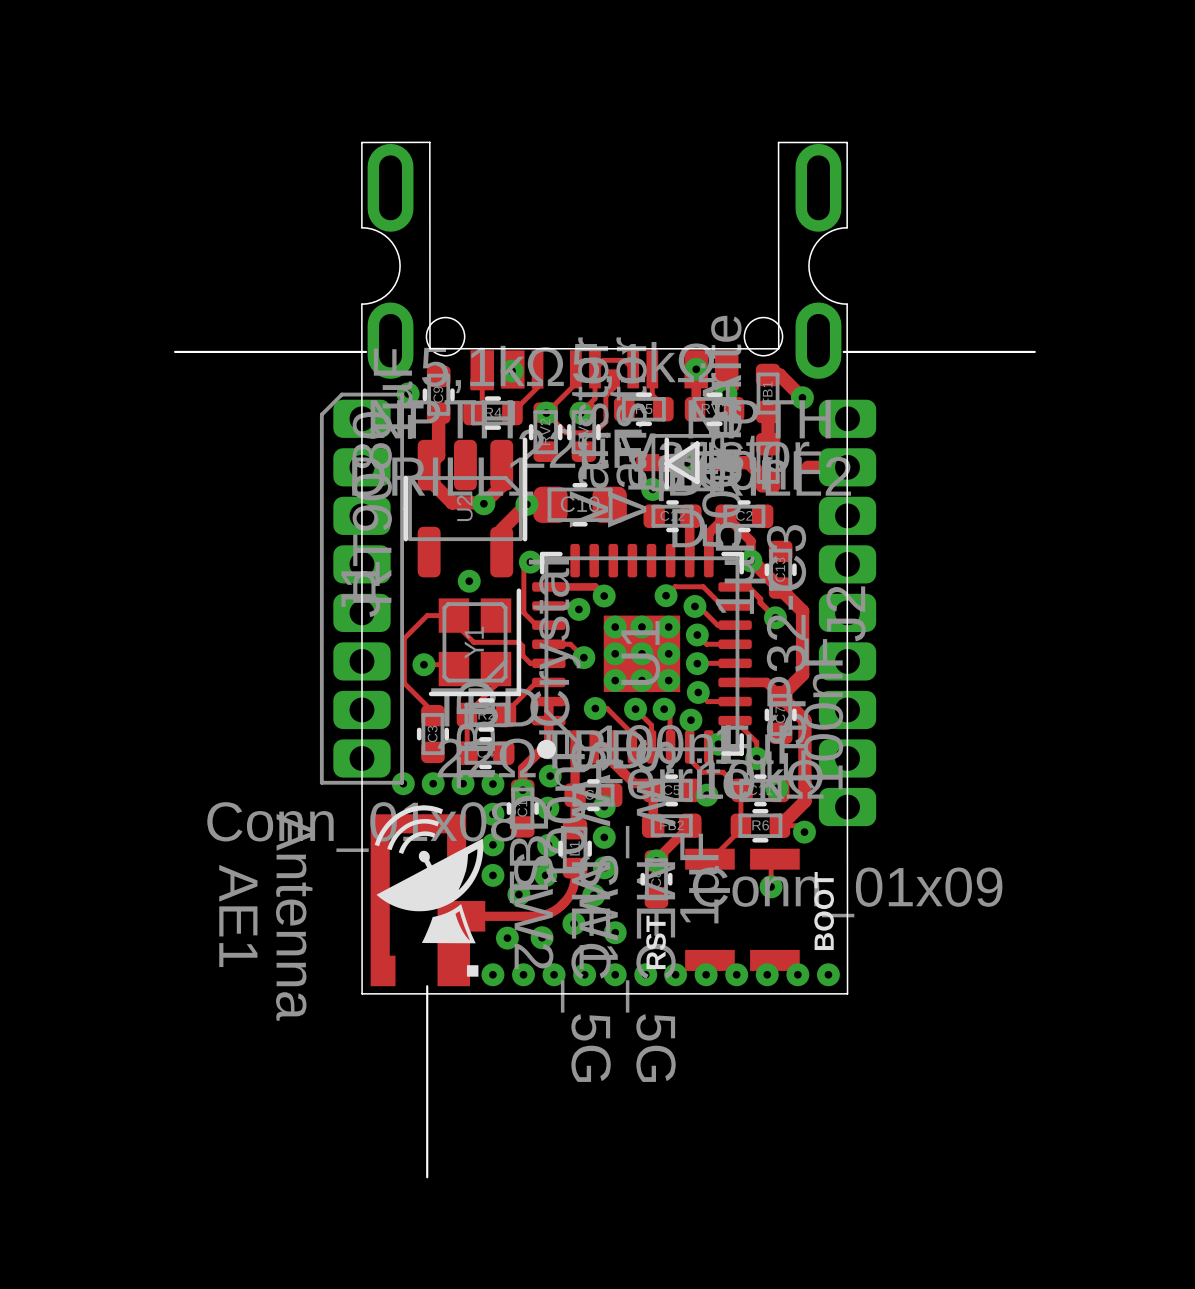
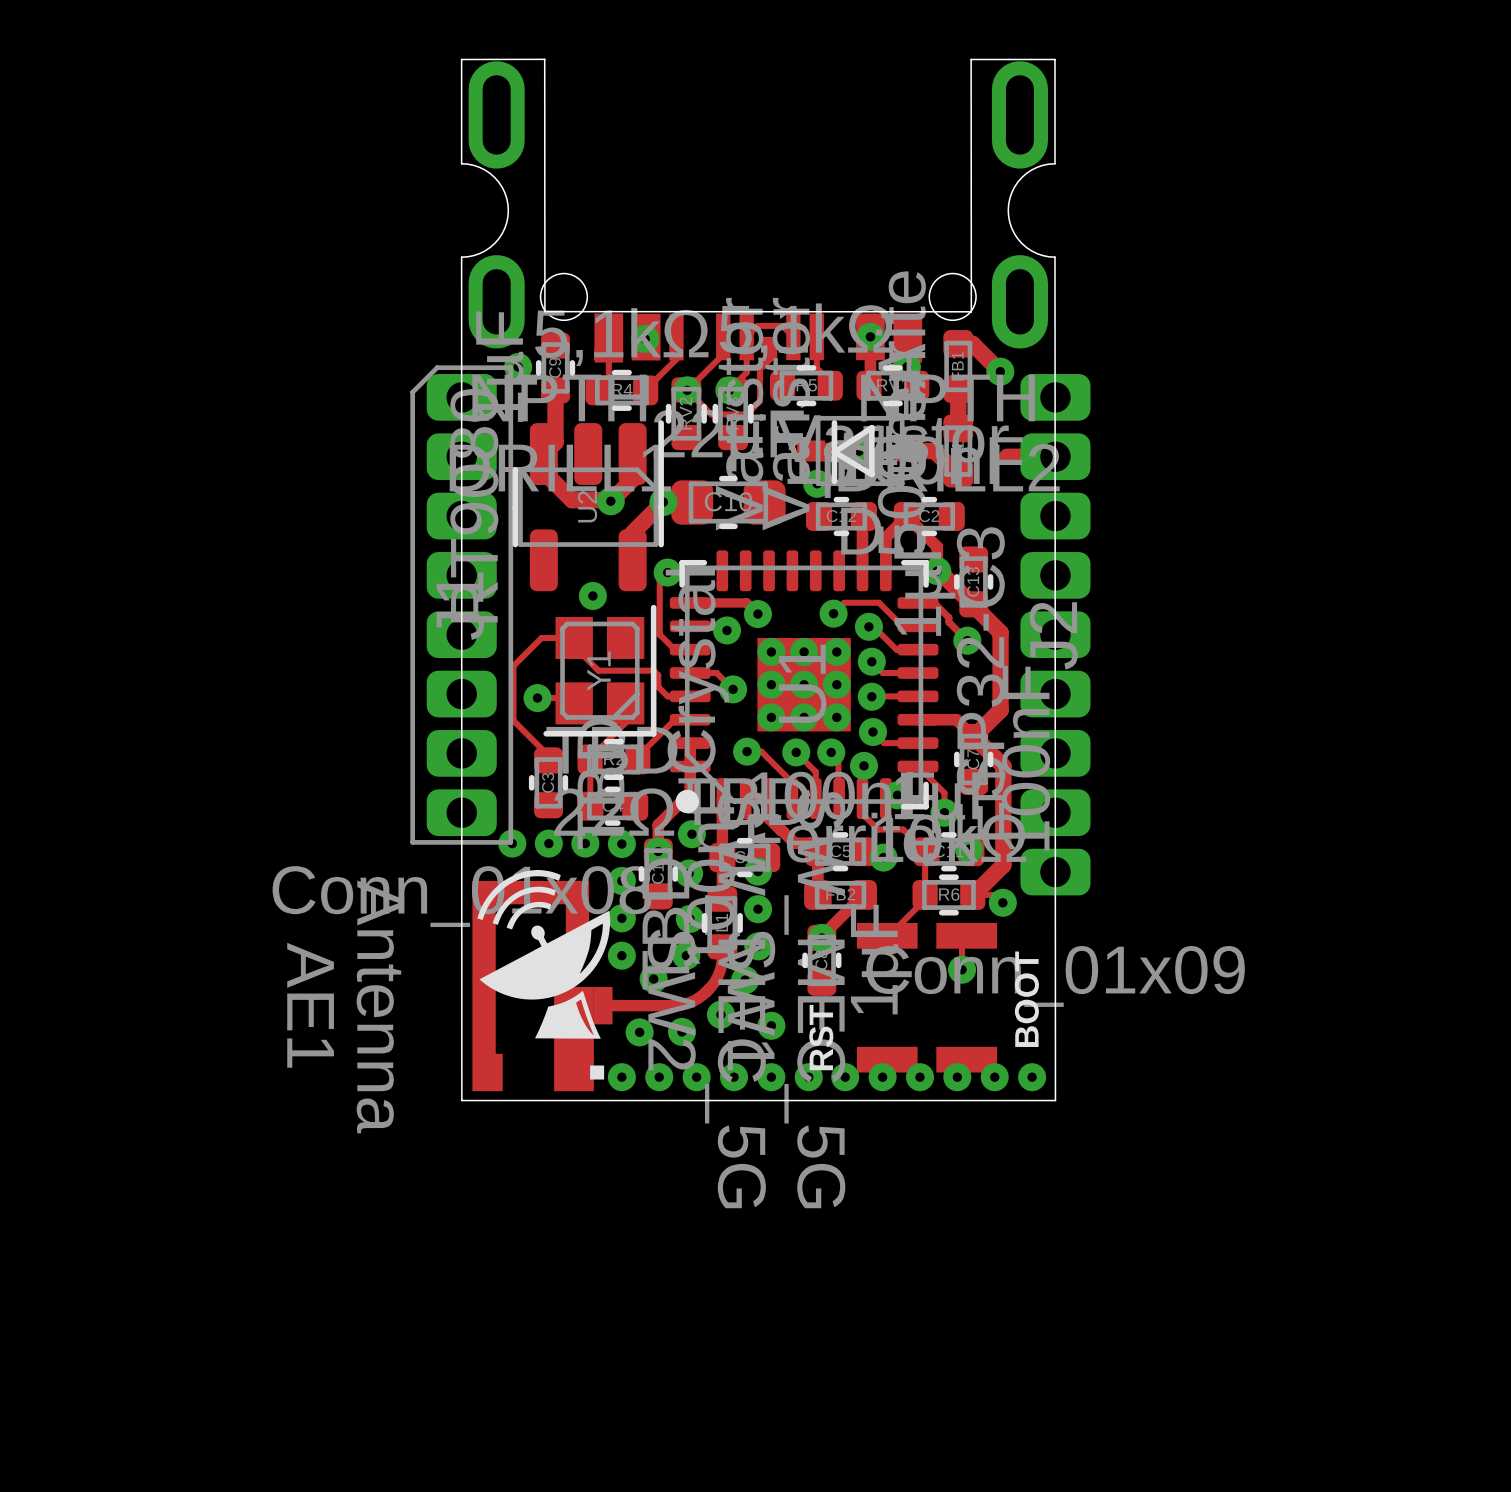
board edge: (175, 351) (366, 351) -> none
board edge: (843, 351) (1034, 351) -> none
board edge: (427, 986) (427, 1177) -> none

